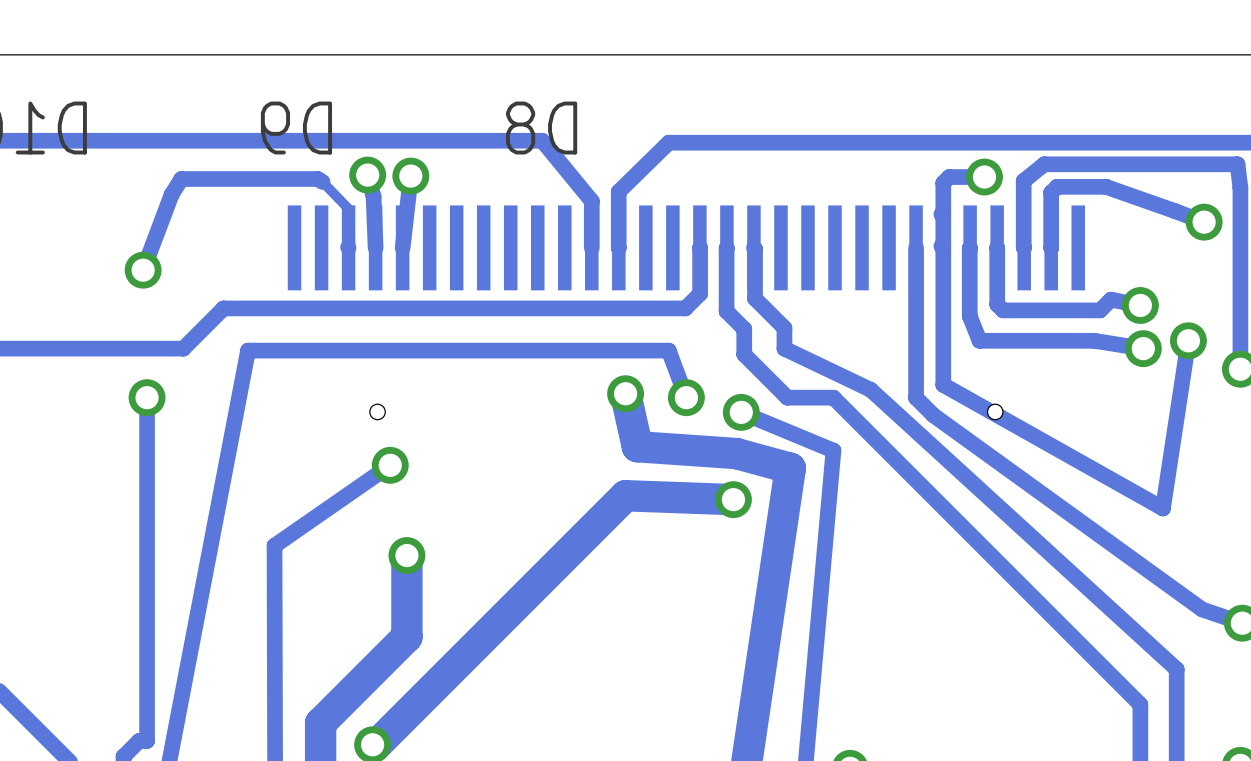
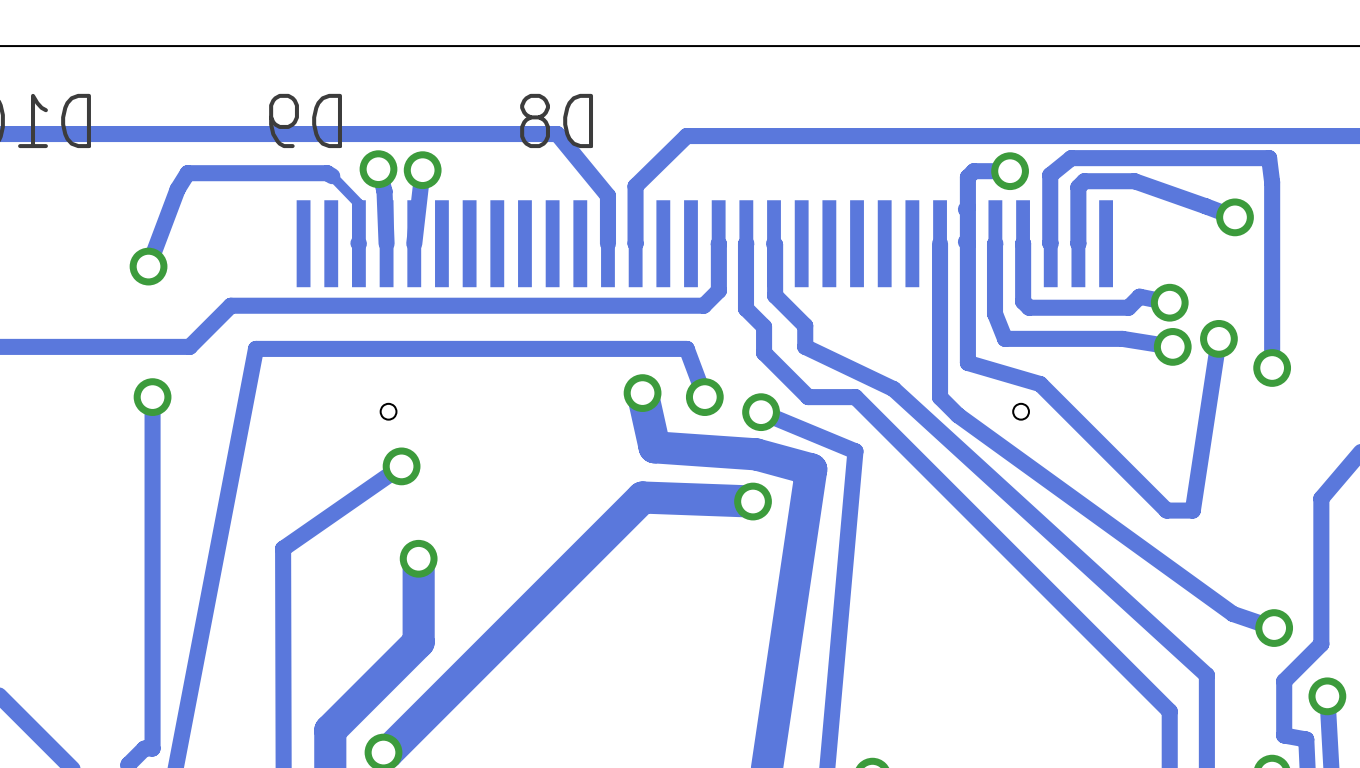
track: (943, 364) (943, 384) (1162, 508) -> (967, 362) (1040, 384) (1166, 510) (1192, 510)

